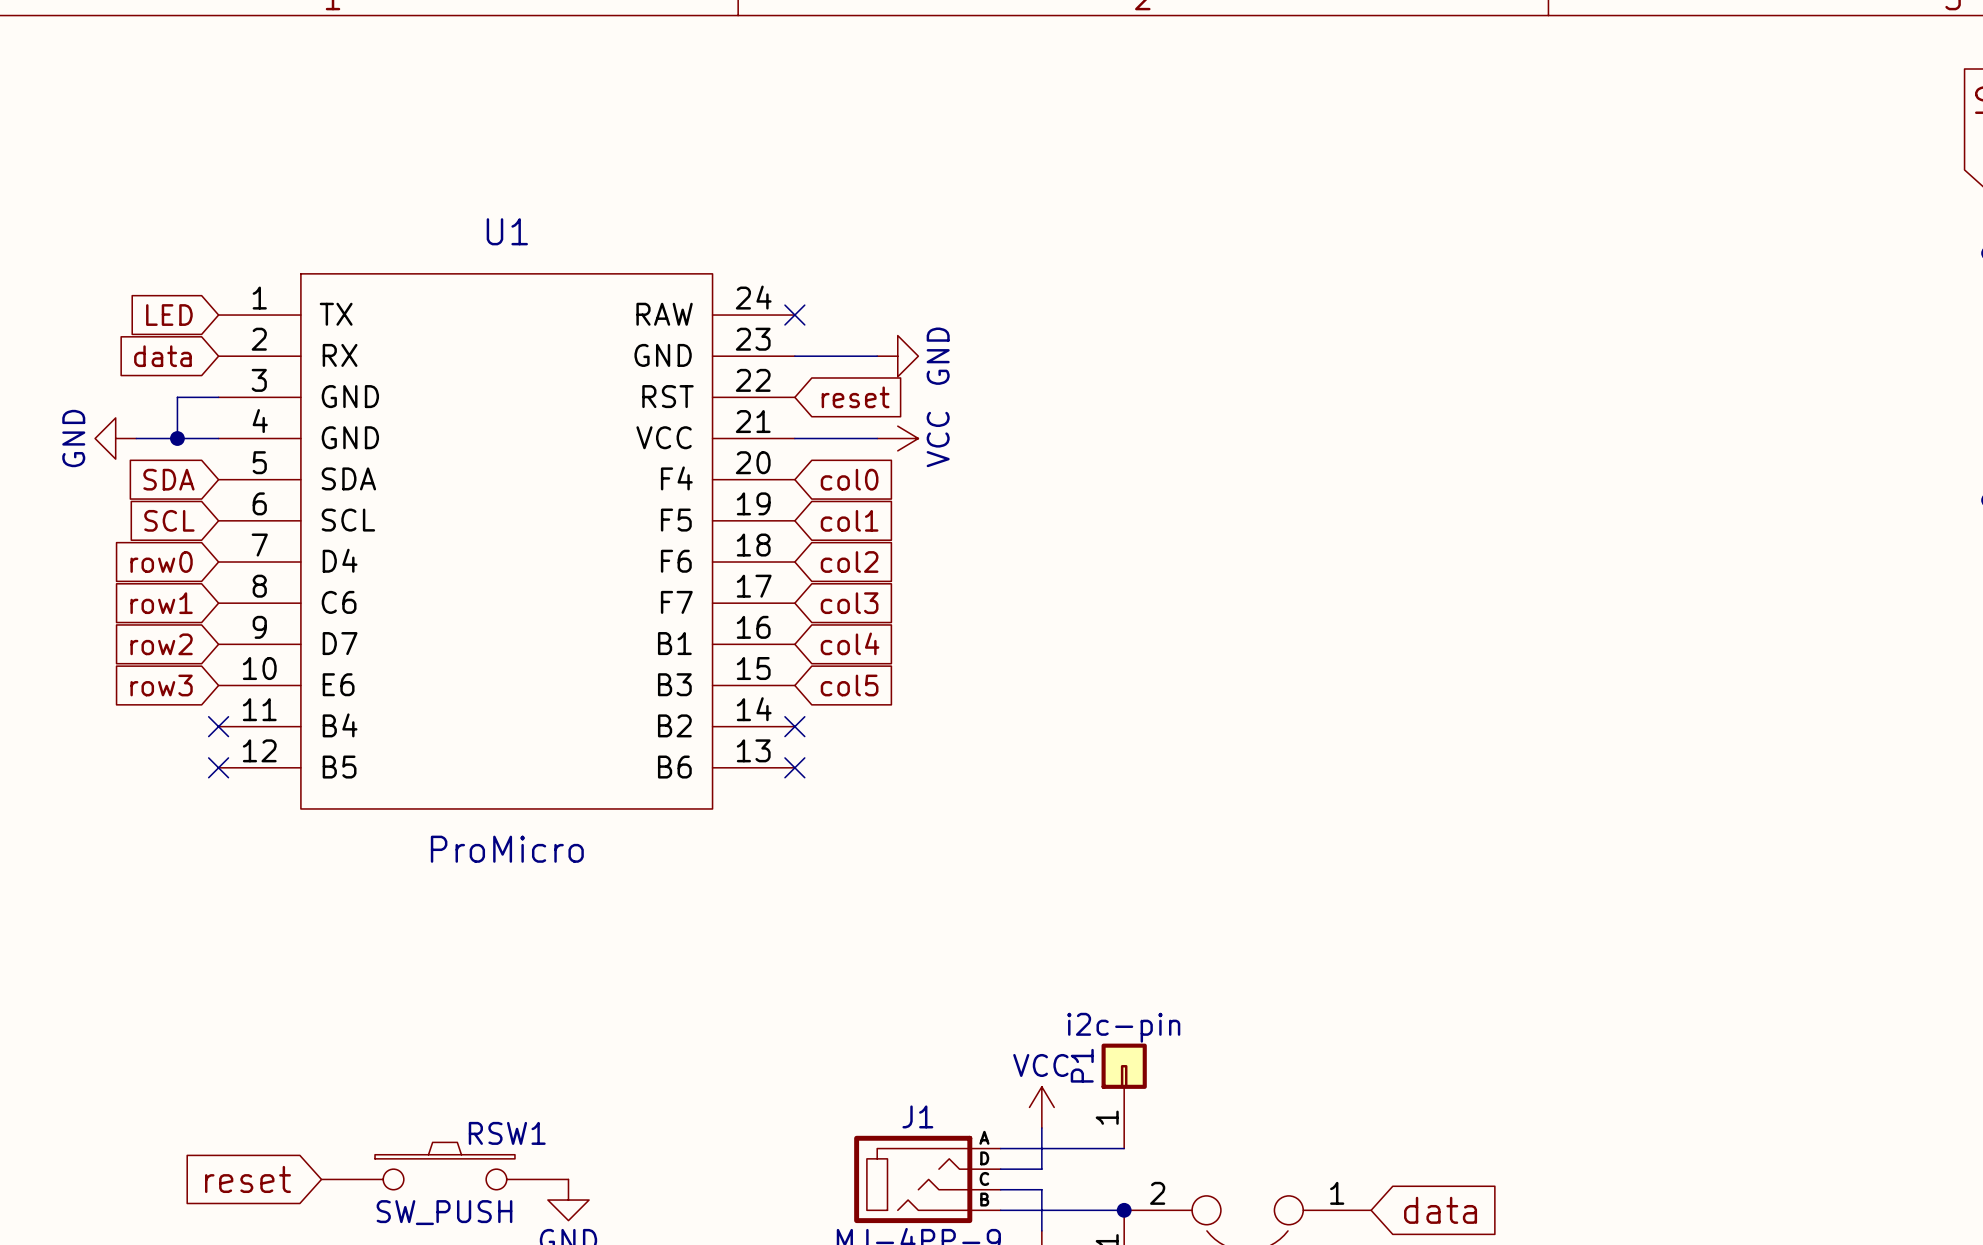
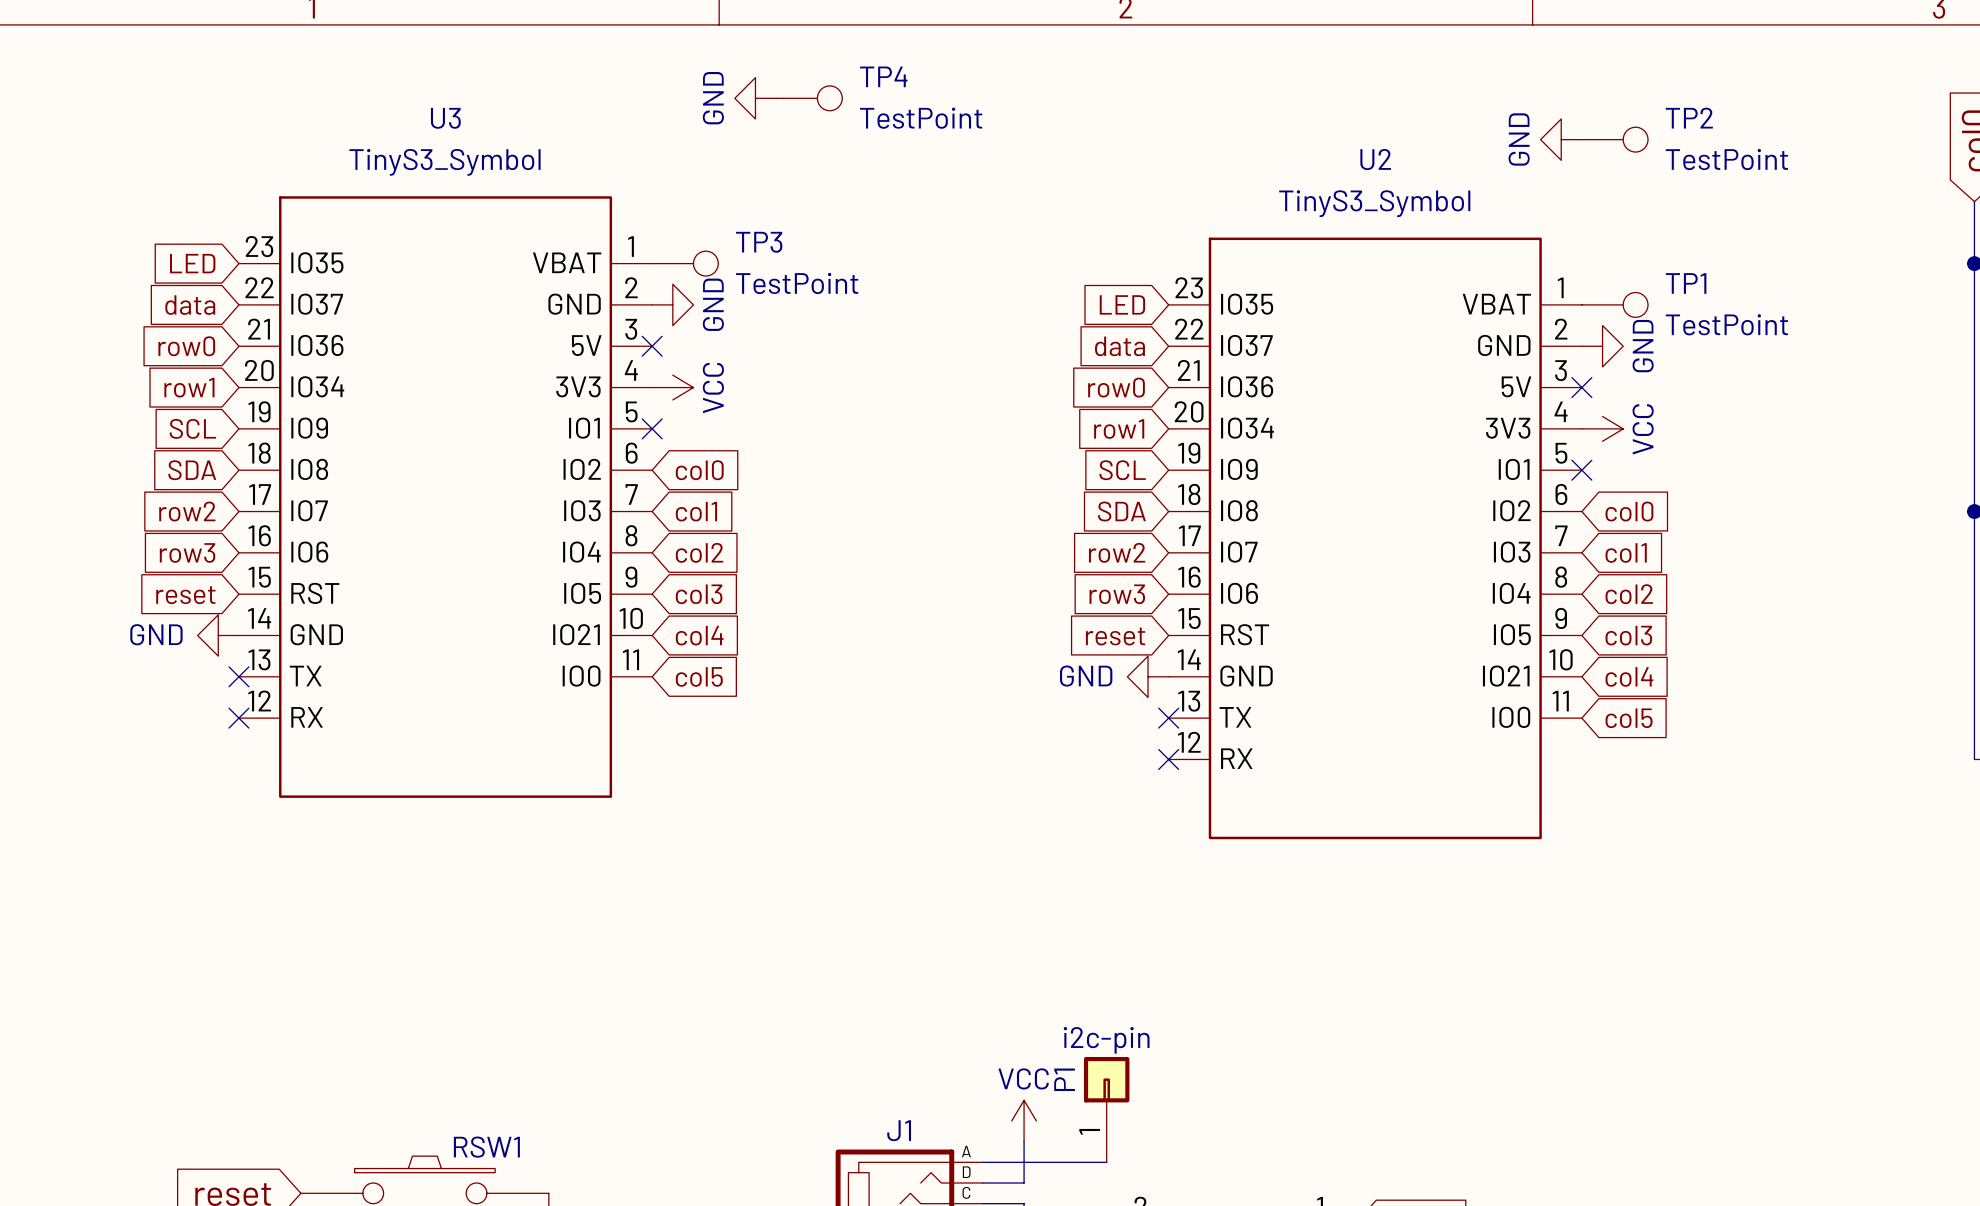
power symbol: none -> GND (755, 98)
TP4: none -> TestPoint (809, 98)
power symbol: none -> GND (1561, 139)
TP2: none -> TestPoint (1614, 139)
TP3: none -> TestPoint (685, 263)
power symbol: none -> GND (672, 304)
global label: none -> LED (1122, 304)
TP1: none -> TestPoint (1614, 304)
global label position: LED (169, 315) -> LED (192, 263)
no-connect mark: (794, 315) -> none
no-connect mark: none -> (652, 346)
global label: none -> data (1119, 346)
power symbol: none -> GND (1602, 346)
global label position: data (162, 356) -> data (190, 305)
wire: (794, 356) (877, 356) -> none
power symbol: GND (897, 356) -> none
global label: none -> row0 (1116, 387)
no-connect mark: none -> (1581, 387)
wire: (218, 397) (177, 397) (177, 438) -> none
global label: reset (855, 397) -> none
no-connect mark: none -> (652, 428)
global label: none -> row1 (1119, 429)
power symbol: none -> VCC (1602, 428)
power symbol text rotation: 0° (73, 438) -> 90° clockwise (156, 634)
power symbol position: GND (115, 438) -> GND (218, 635)
wire: (136, 438) (218, 438) -> none
junction: (177, 438) -> none
wire: (794, 438) (877, 438) -> none
power symbol position: VCC (897, 438) -> VCC (672, 387)
global label: none -> SCL (1122, 470)
no-connect mark: none -> (1581, 470)
global label position: SDA (168, 479) -> SDA (192, 470)
global label position: col0 (849, 479) -> col0 (699, 470)
U3: none -> TinyS3_Symbol (445, 497)
global label: none -> SDA (1121, 511)
global label: none -> col0 (1629, 511)
global label position: SCL (169, 520) -> SCL (192, 428)
global label position: col1 (849, 520) -> col1 (696, 511)
U2: none -> TinyS3_Symbol (1375, 538)
U1: ProMicro (506, 541) -> none
global label: none -> row2 (1117, 552)
global label: none -> col1 (1626, 552)
global label position: row0 (161, 562) -> row0 (186, 346)
global label position: col2 (849, 562) -> col2 (699, 552)
global label: none -> reset (185, 595)
global label: none -> row3 (1117, 594)
global label: none -> col2 (1629, 594)
global label position: row1 (161, 603) -> row1 (189, 387)
global label position: col3 (849, 603) -> col3 (699, 594)
global label: none -> reset (1115, 636)
global label: none -> col3 (1628, 635)
global label position: col4 (850, 643) -> col4 (699, 635)
global label position: row2 (161, 644) -> row2 (187, 511)
no-connect mark: none -> (238, 676)
power symbol: none -> GND (1148, 676)
global label: none -> col4 (1629, 676)
global label position: row3 (161, 685) -> row3 (187, 552)
global label position: col5 (849, 685) -> col5 (699, 676)
no-connect mark: none -> (238, 718)
no-connect mark: none -> (1168, 718)
global label: none -> col5 (1629, 718)
no-connect mark: (218, 726) -> none
no-connect mark: (794, 726) -> none
no-connect mark: none -> (1168, 759)
no-connect mark: (218, 767) -> none
no-connect mark: (794, 767) -> none

